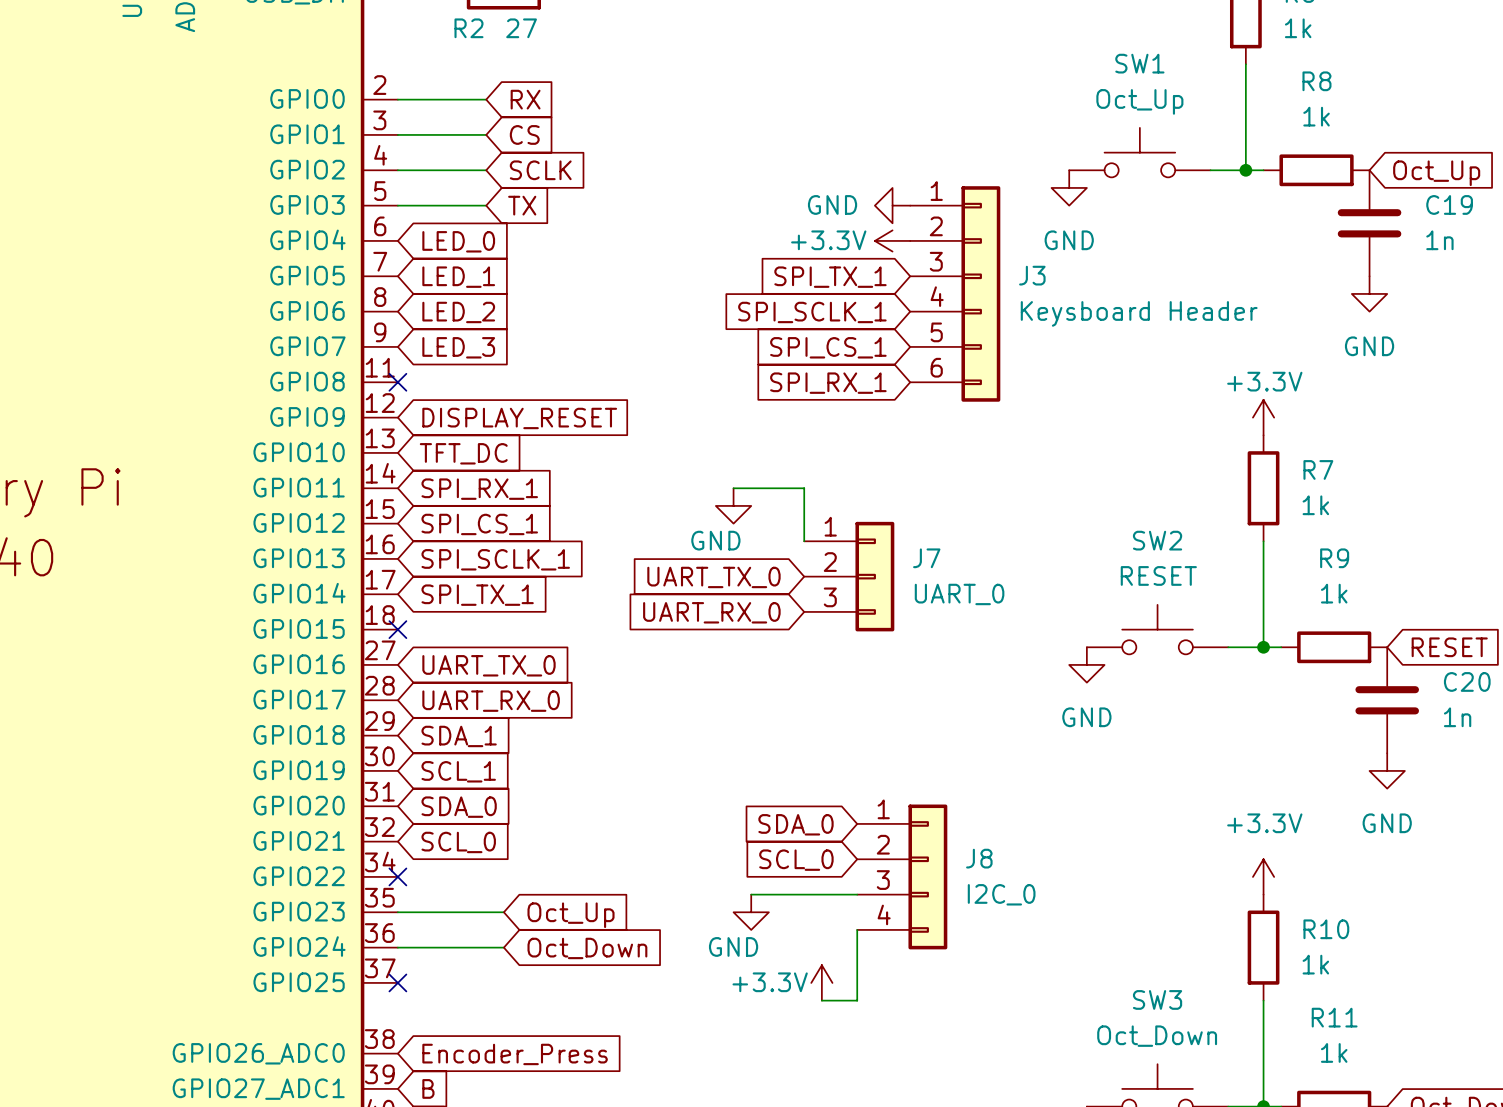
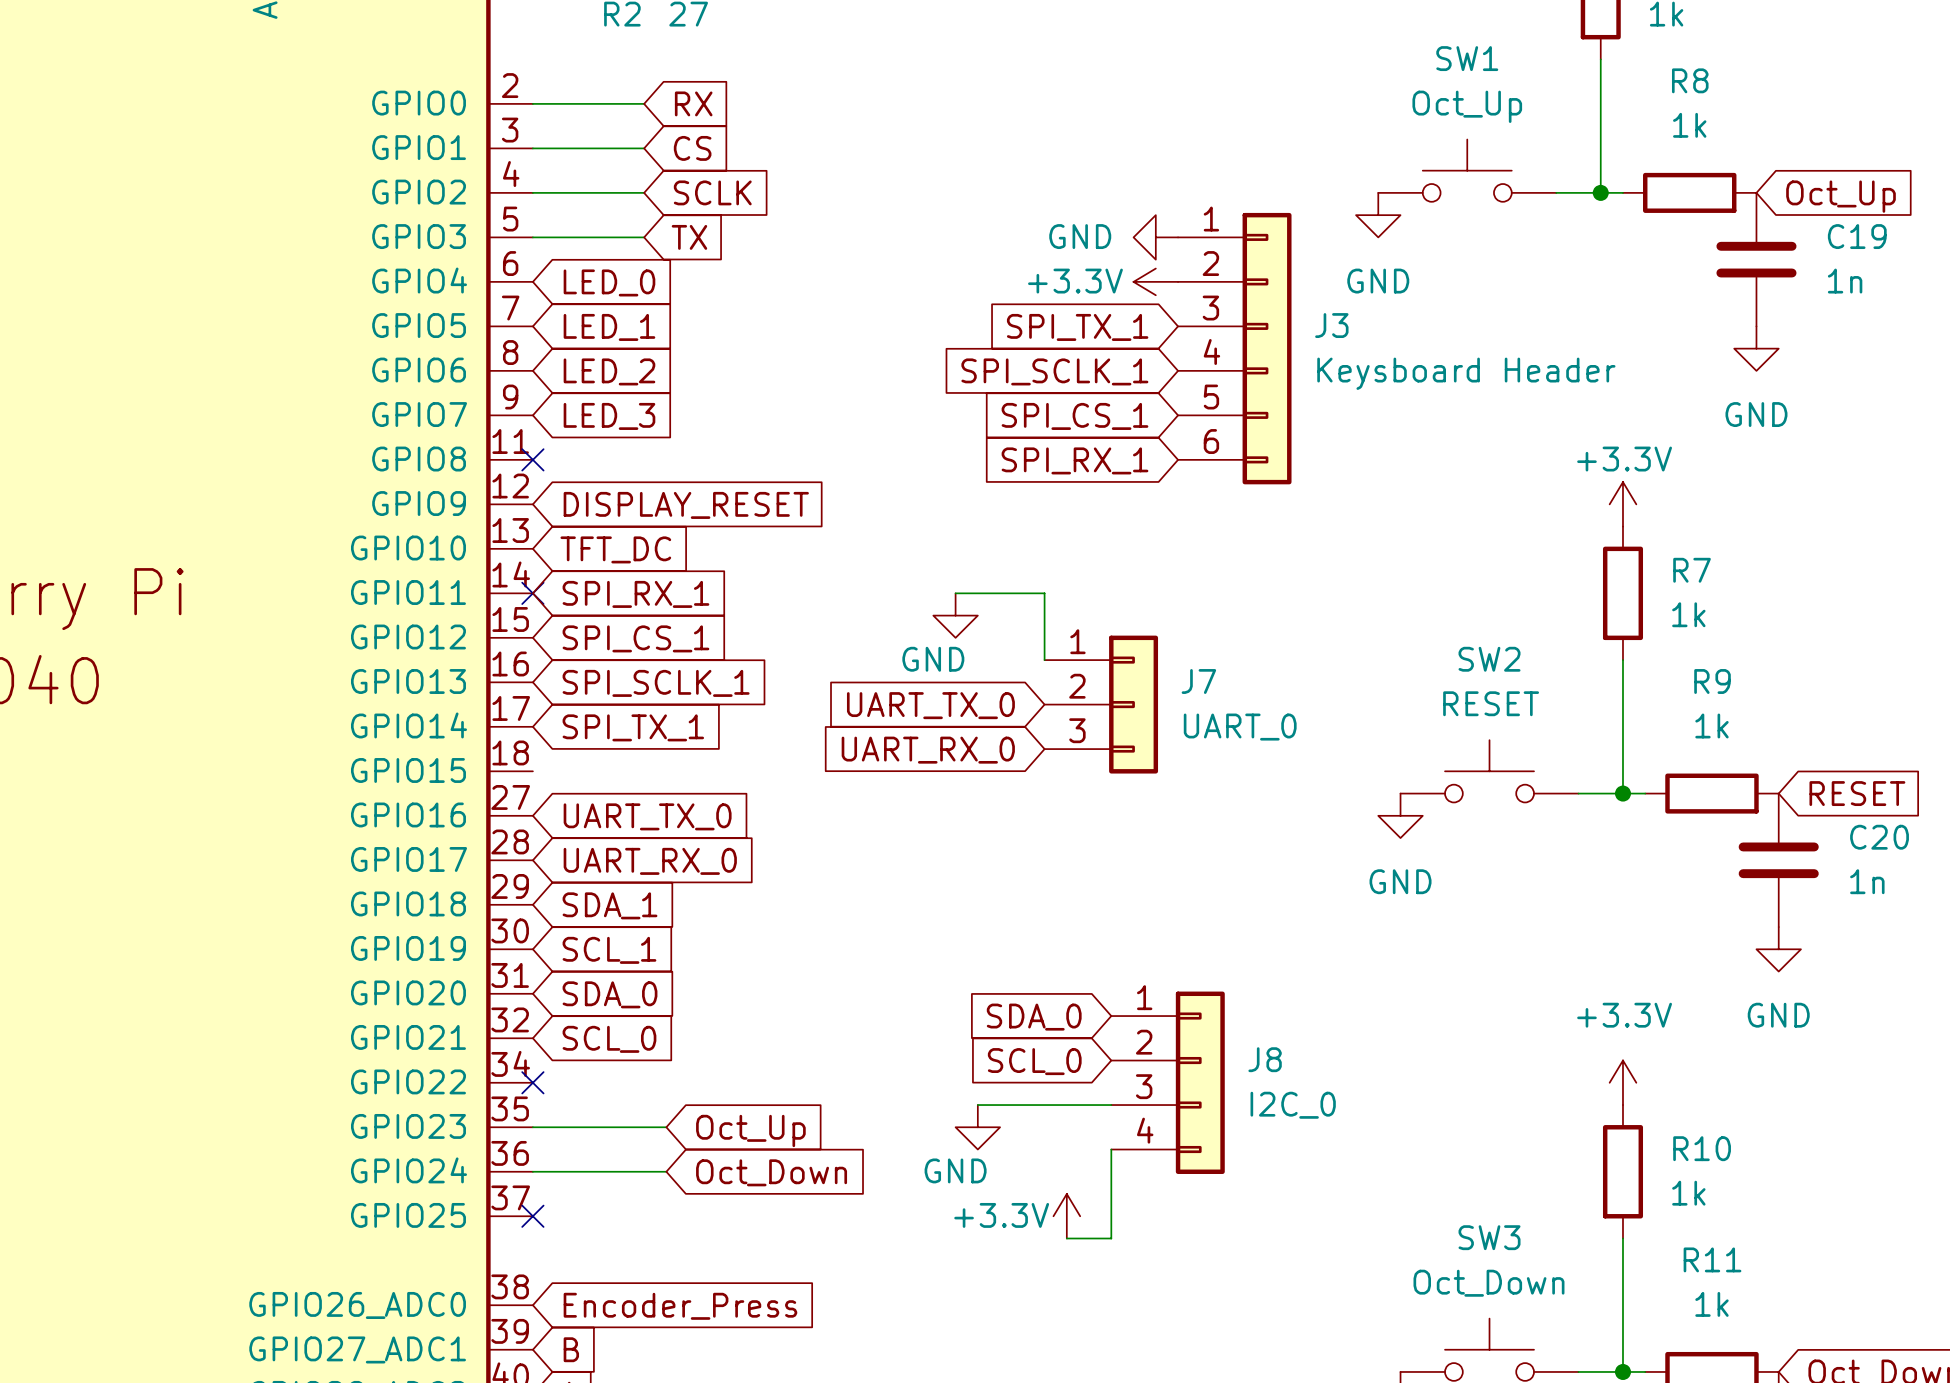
no-connect mark: none -> (532, 593)
no-connect mark: (397, 629) -> none

